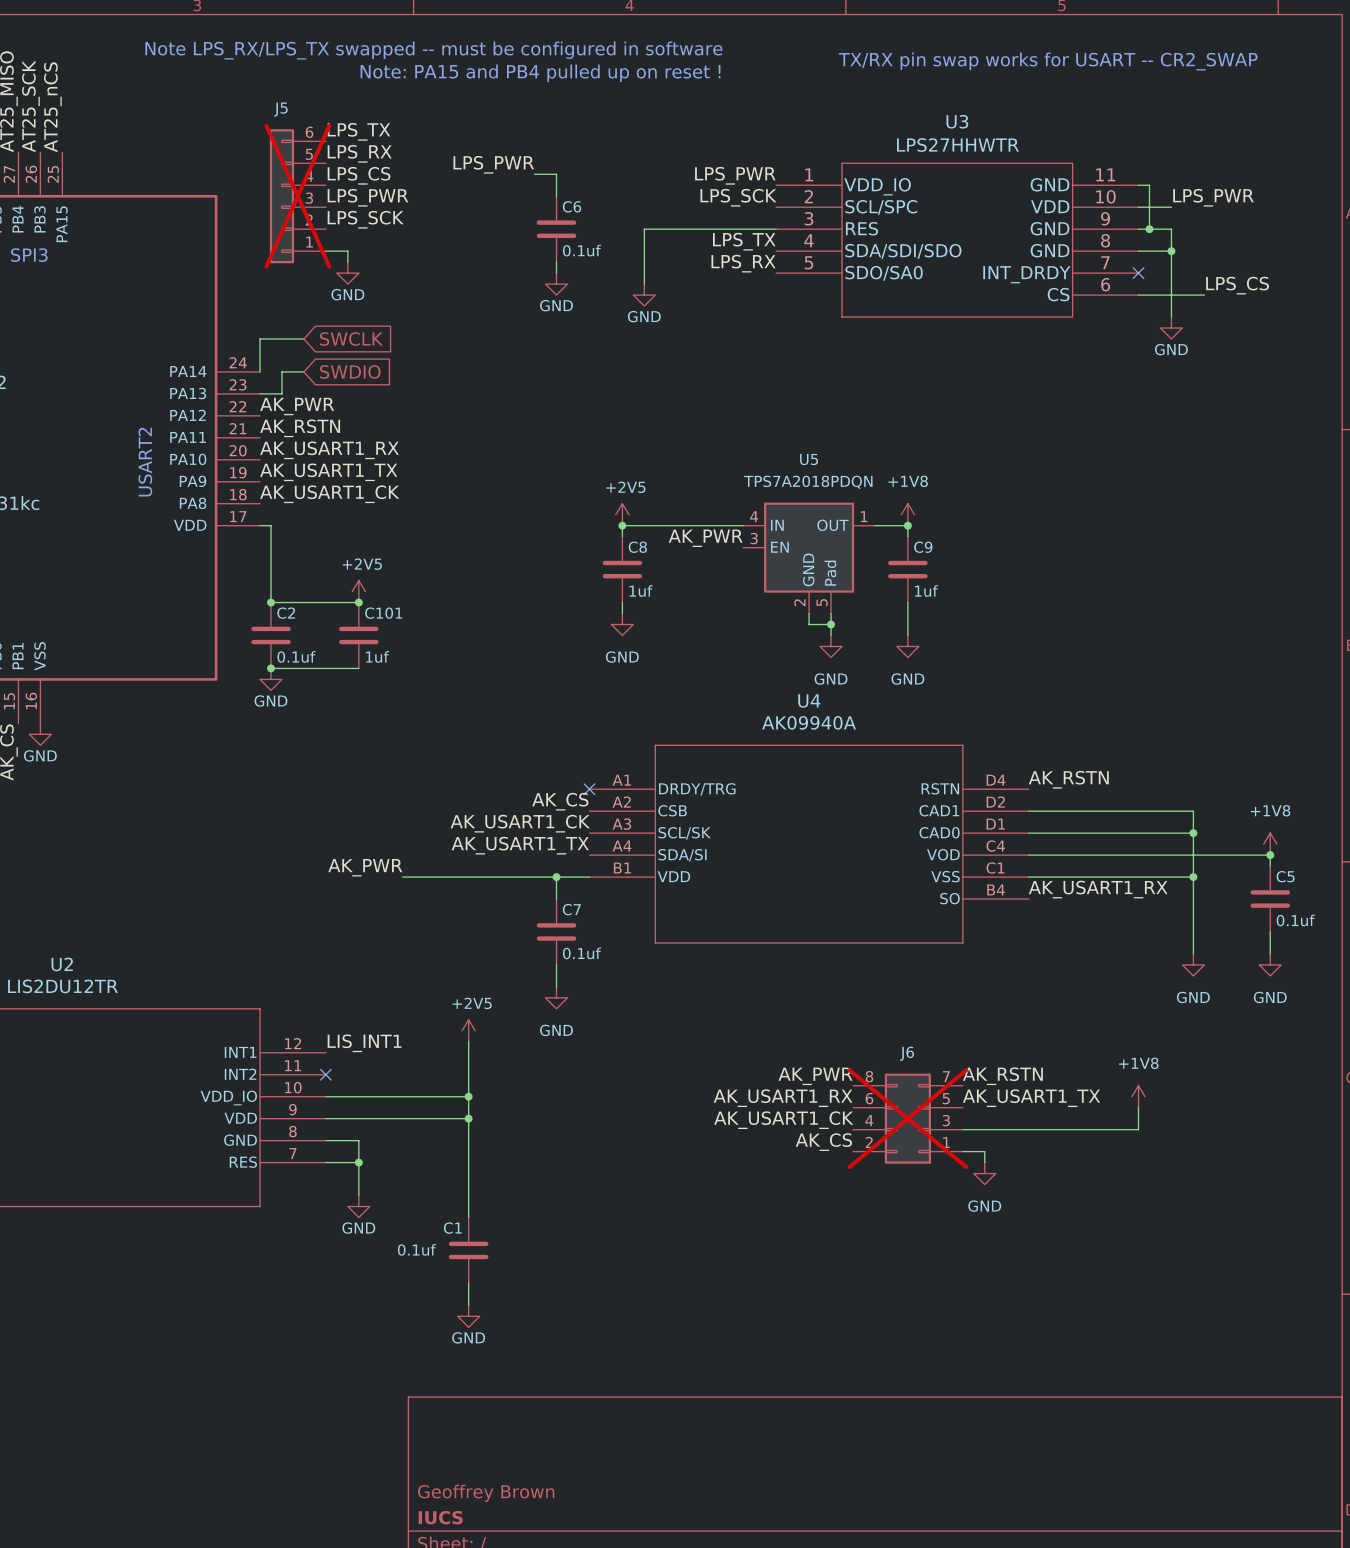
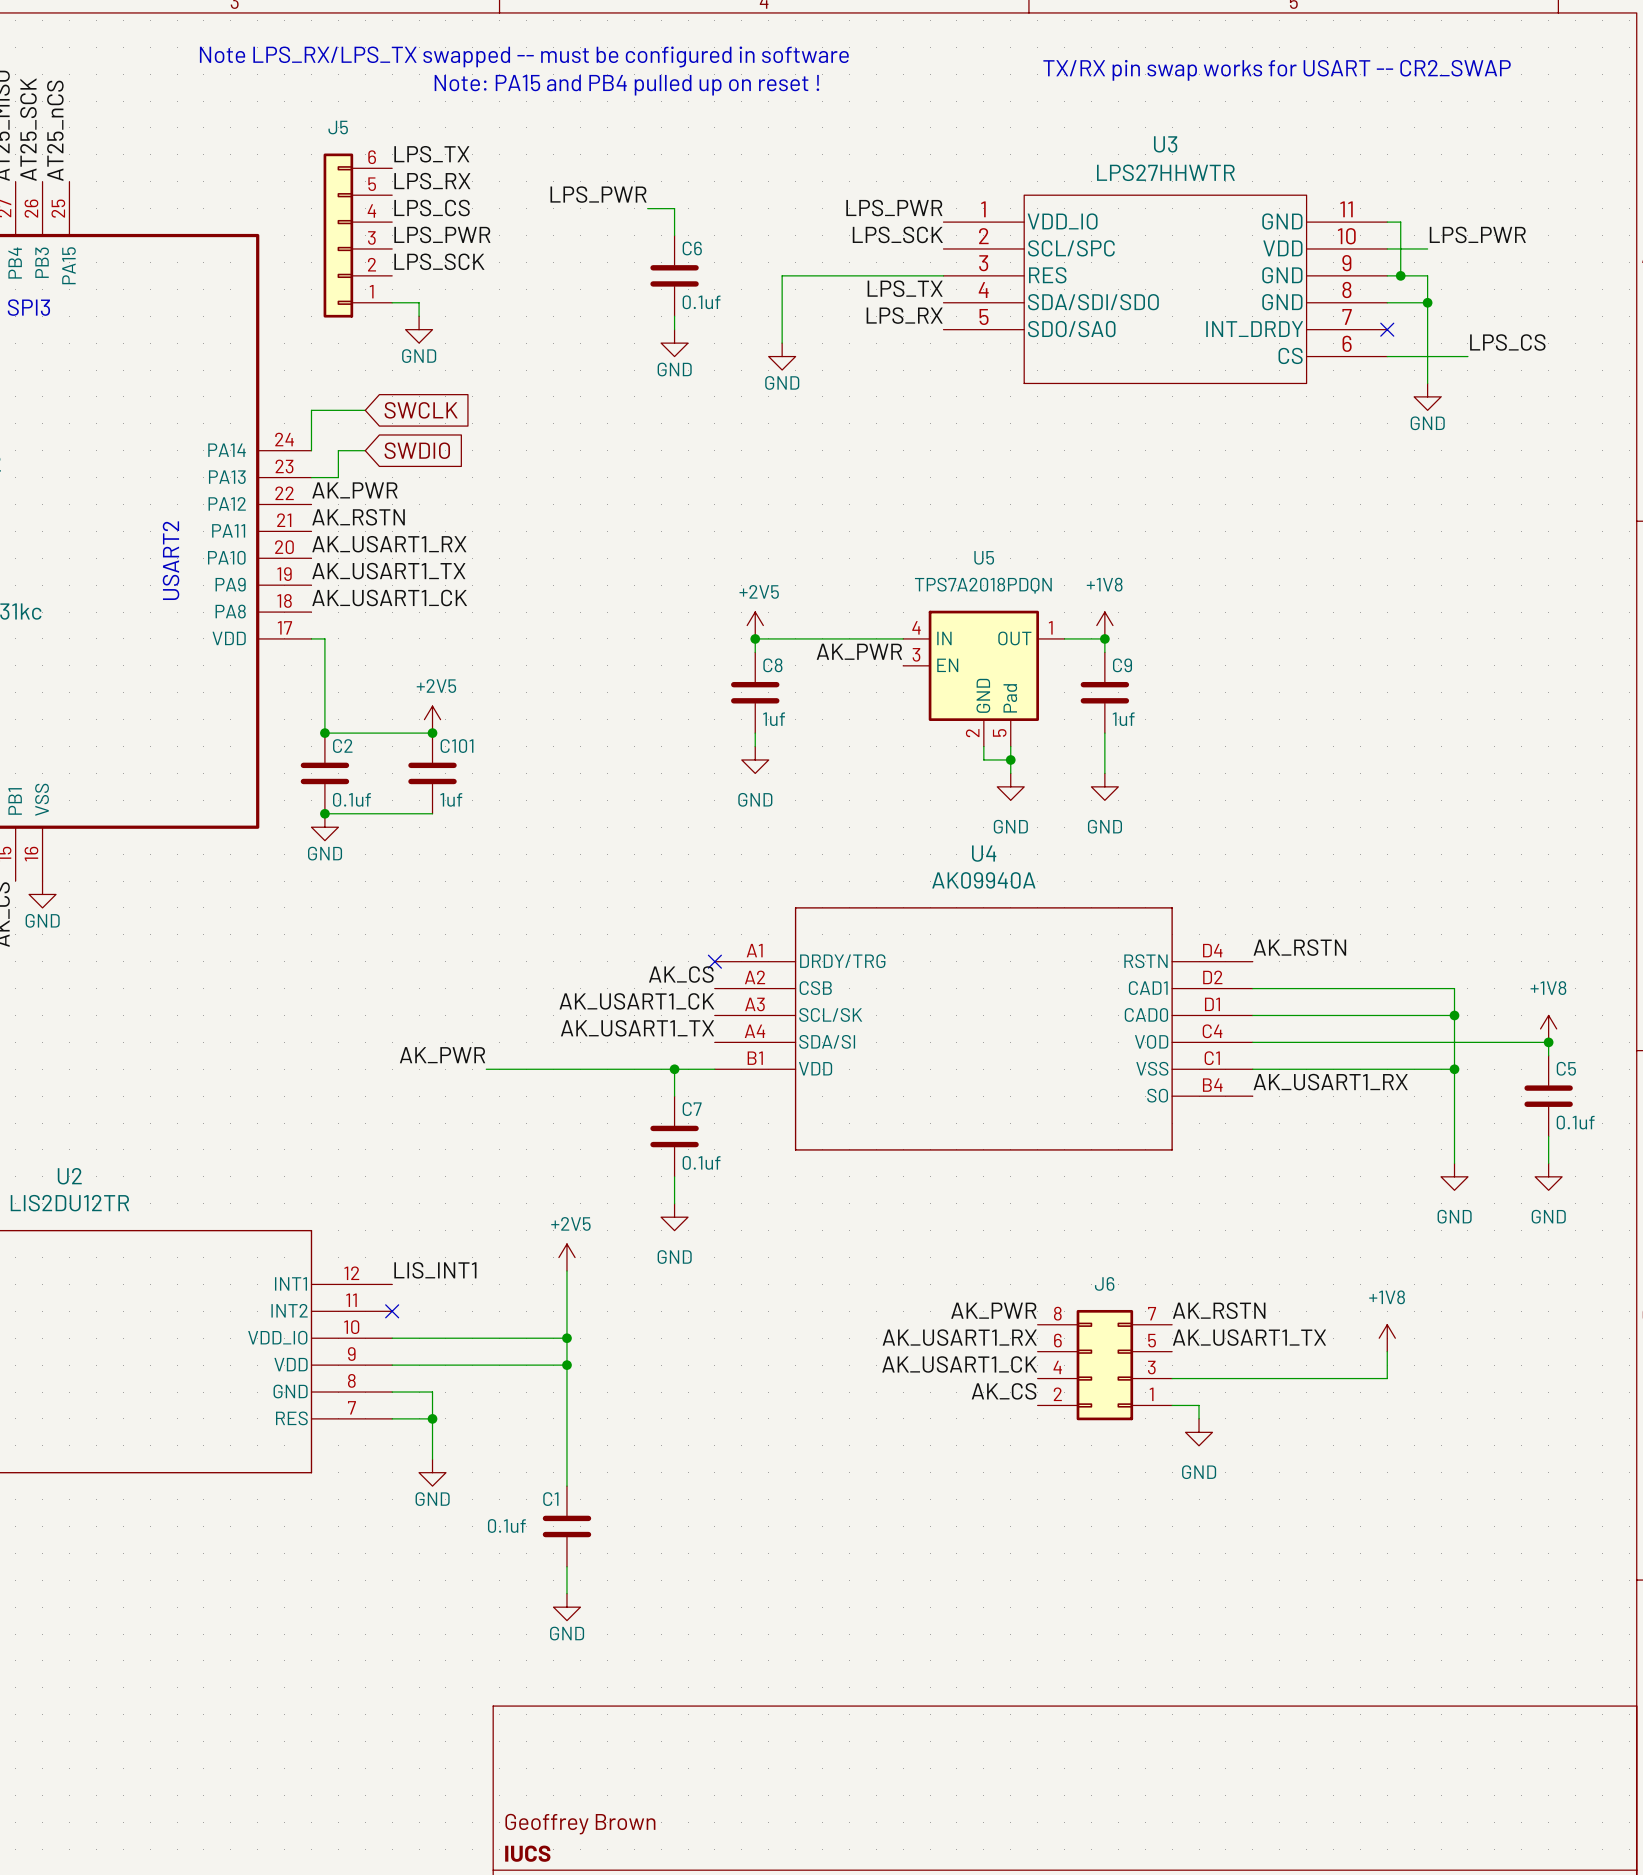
J5 do-not-place cross: (297, 196) -> none
J6 do-not-place cross: (907, 1118) -> none

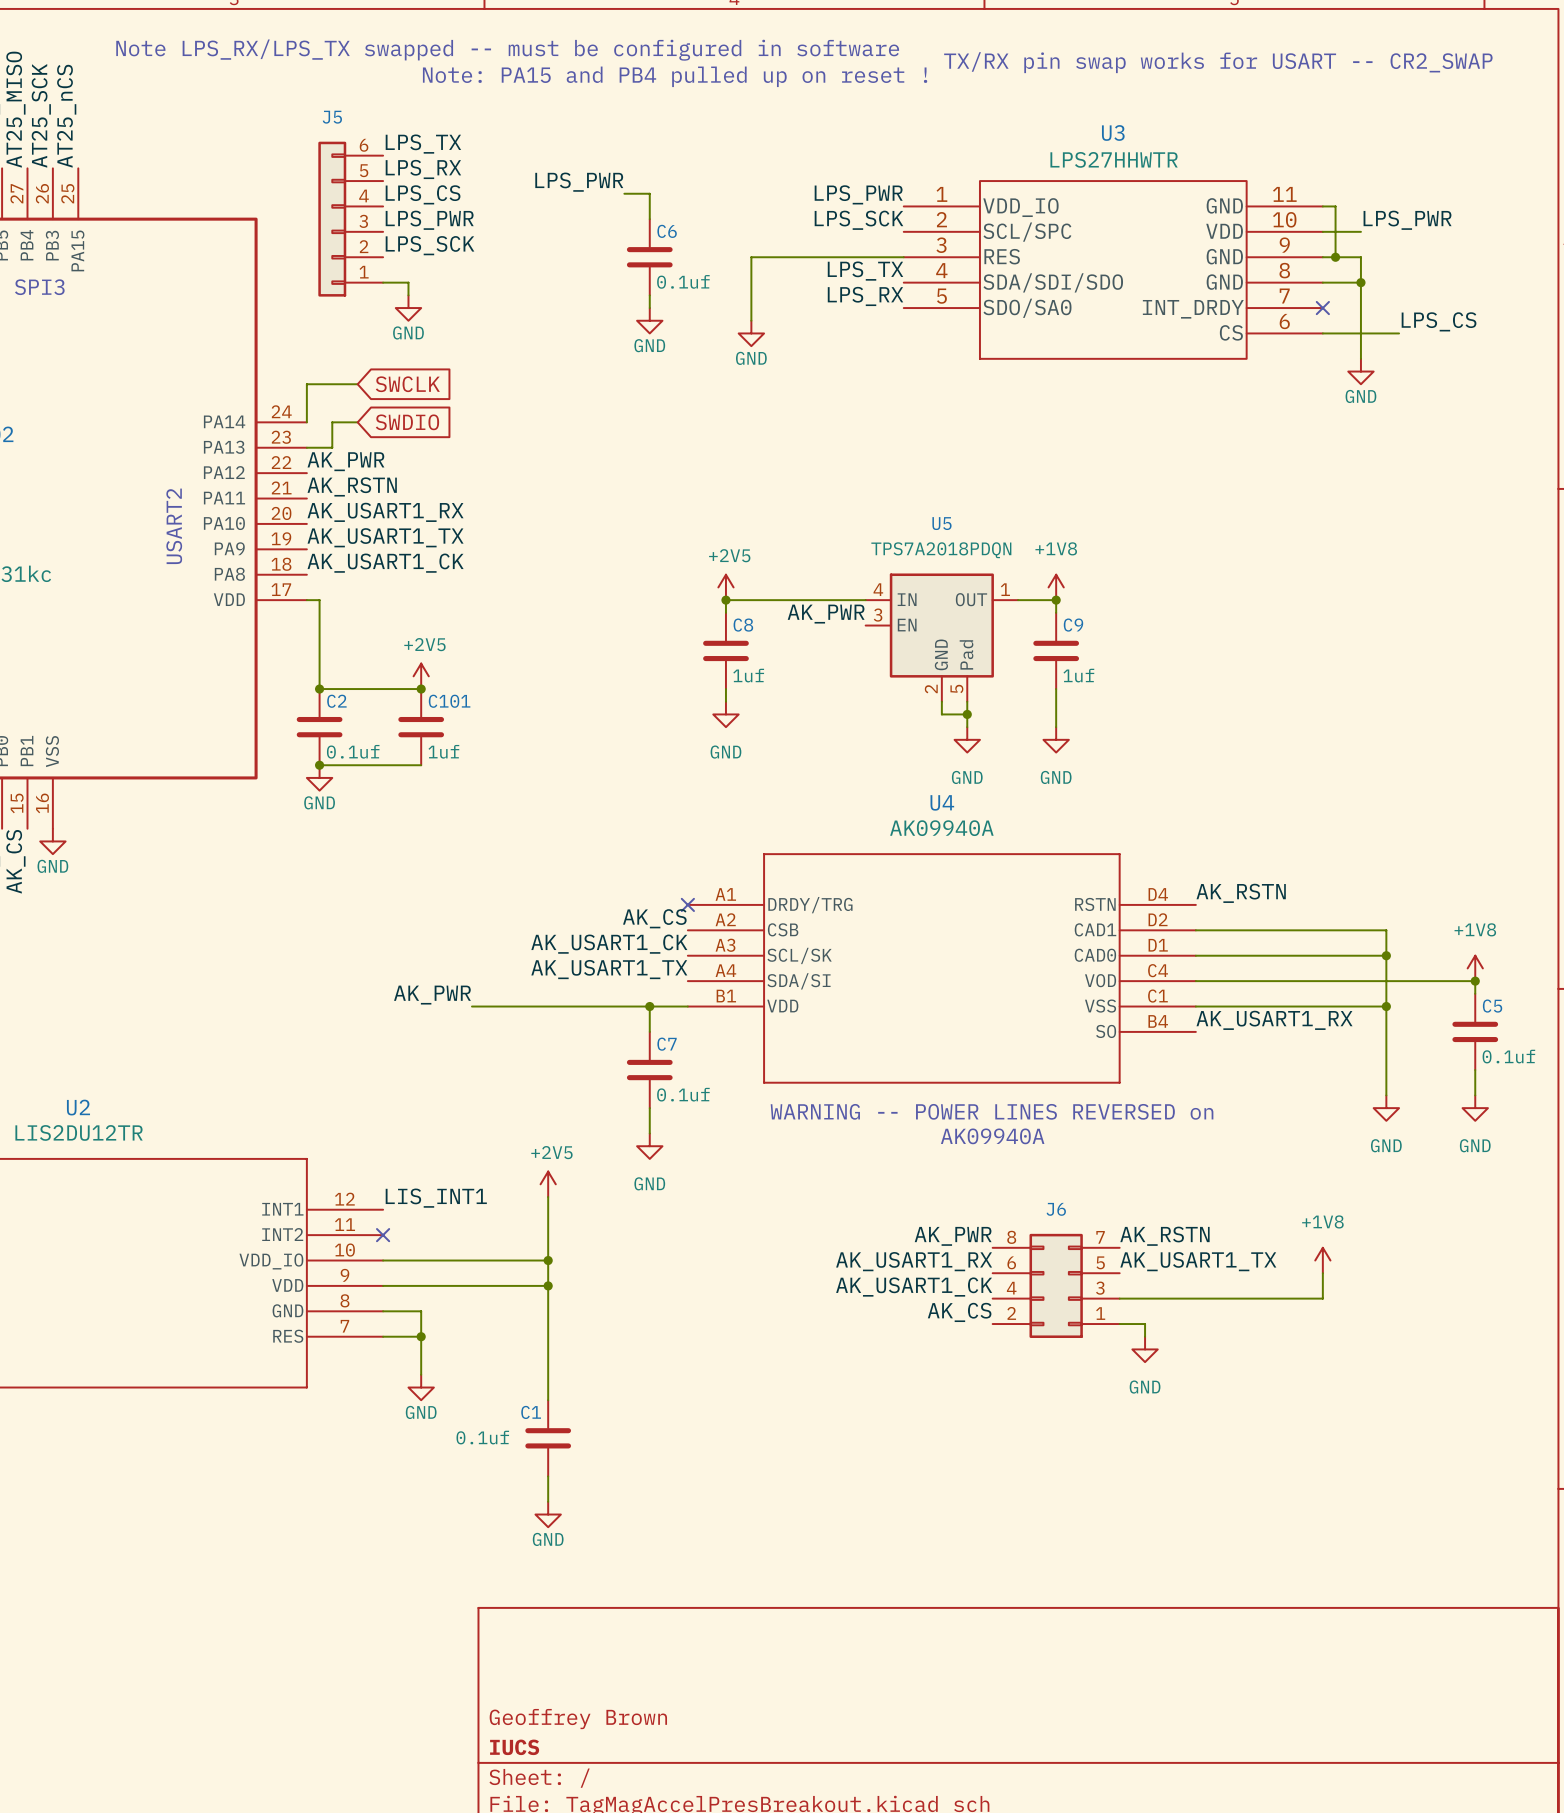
text: none -> WARNING -- POWER LINES REVERSED on (992, 1111)
text: none -> AK09940A (992, 1136)

